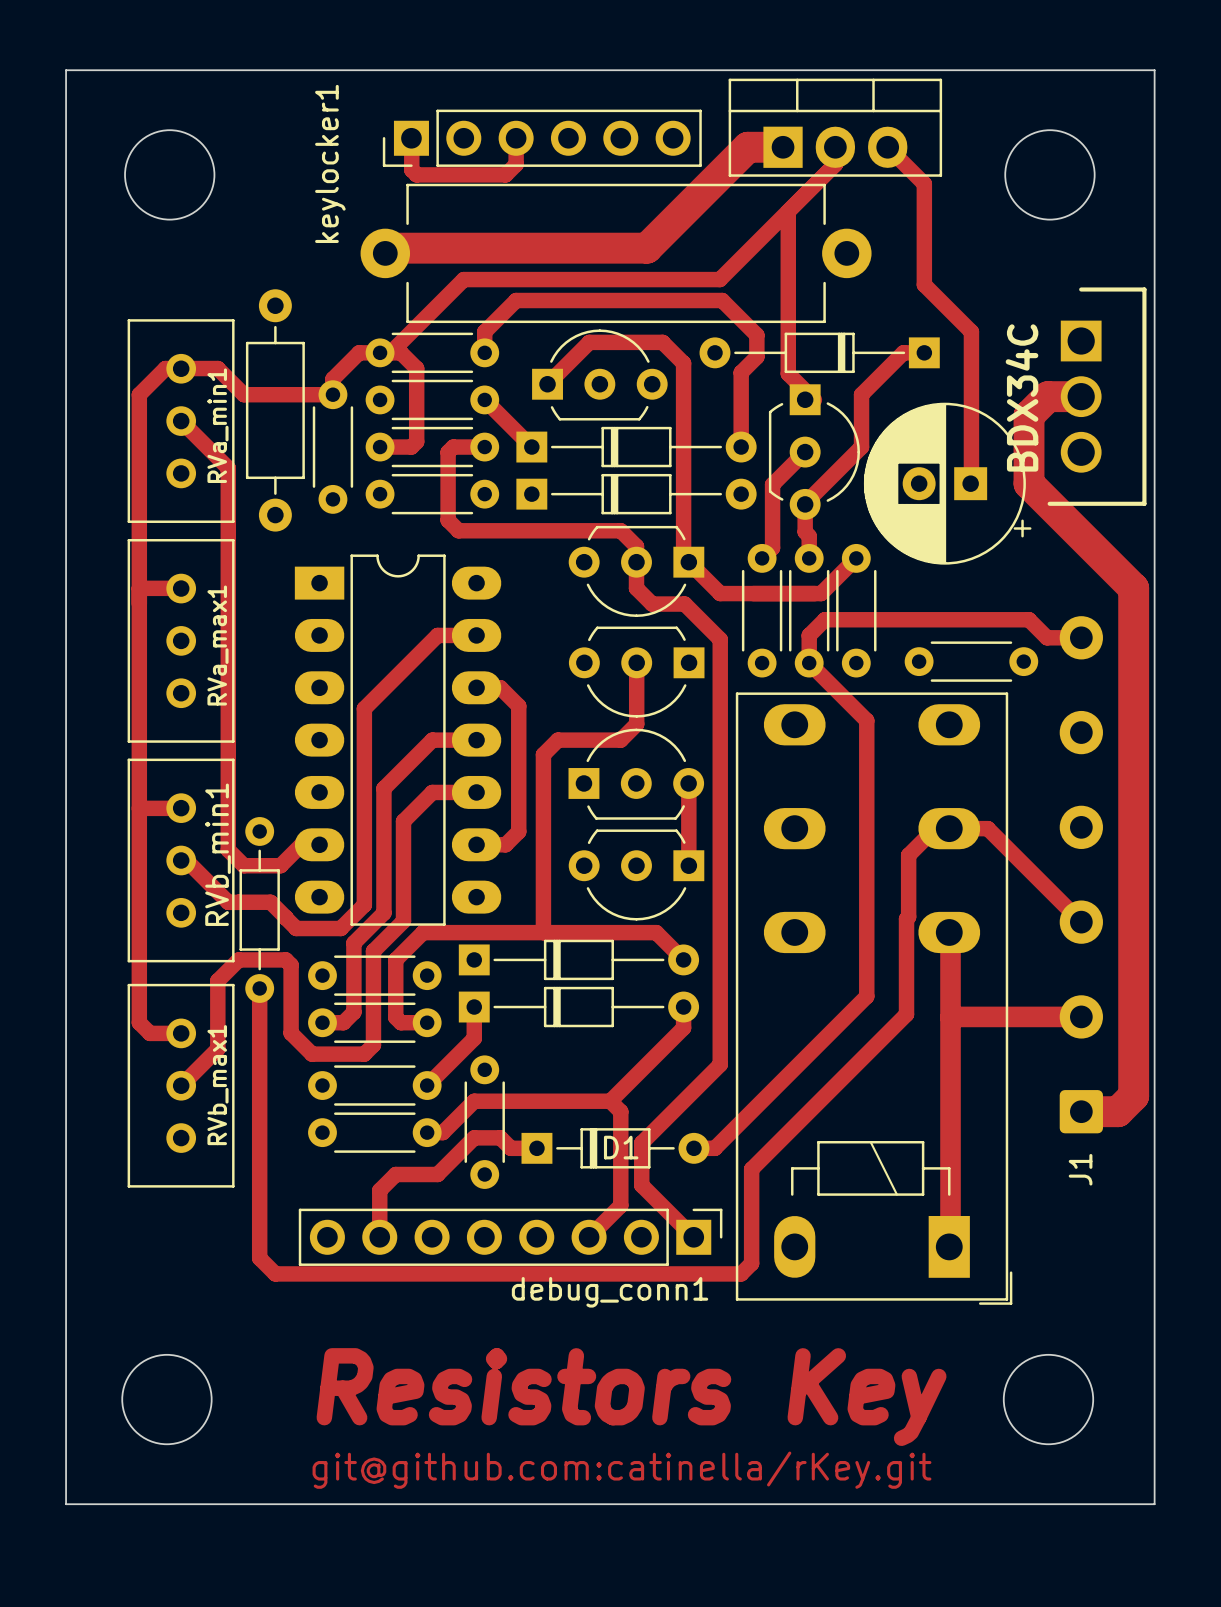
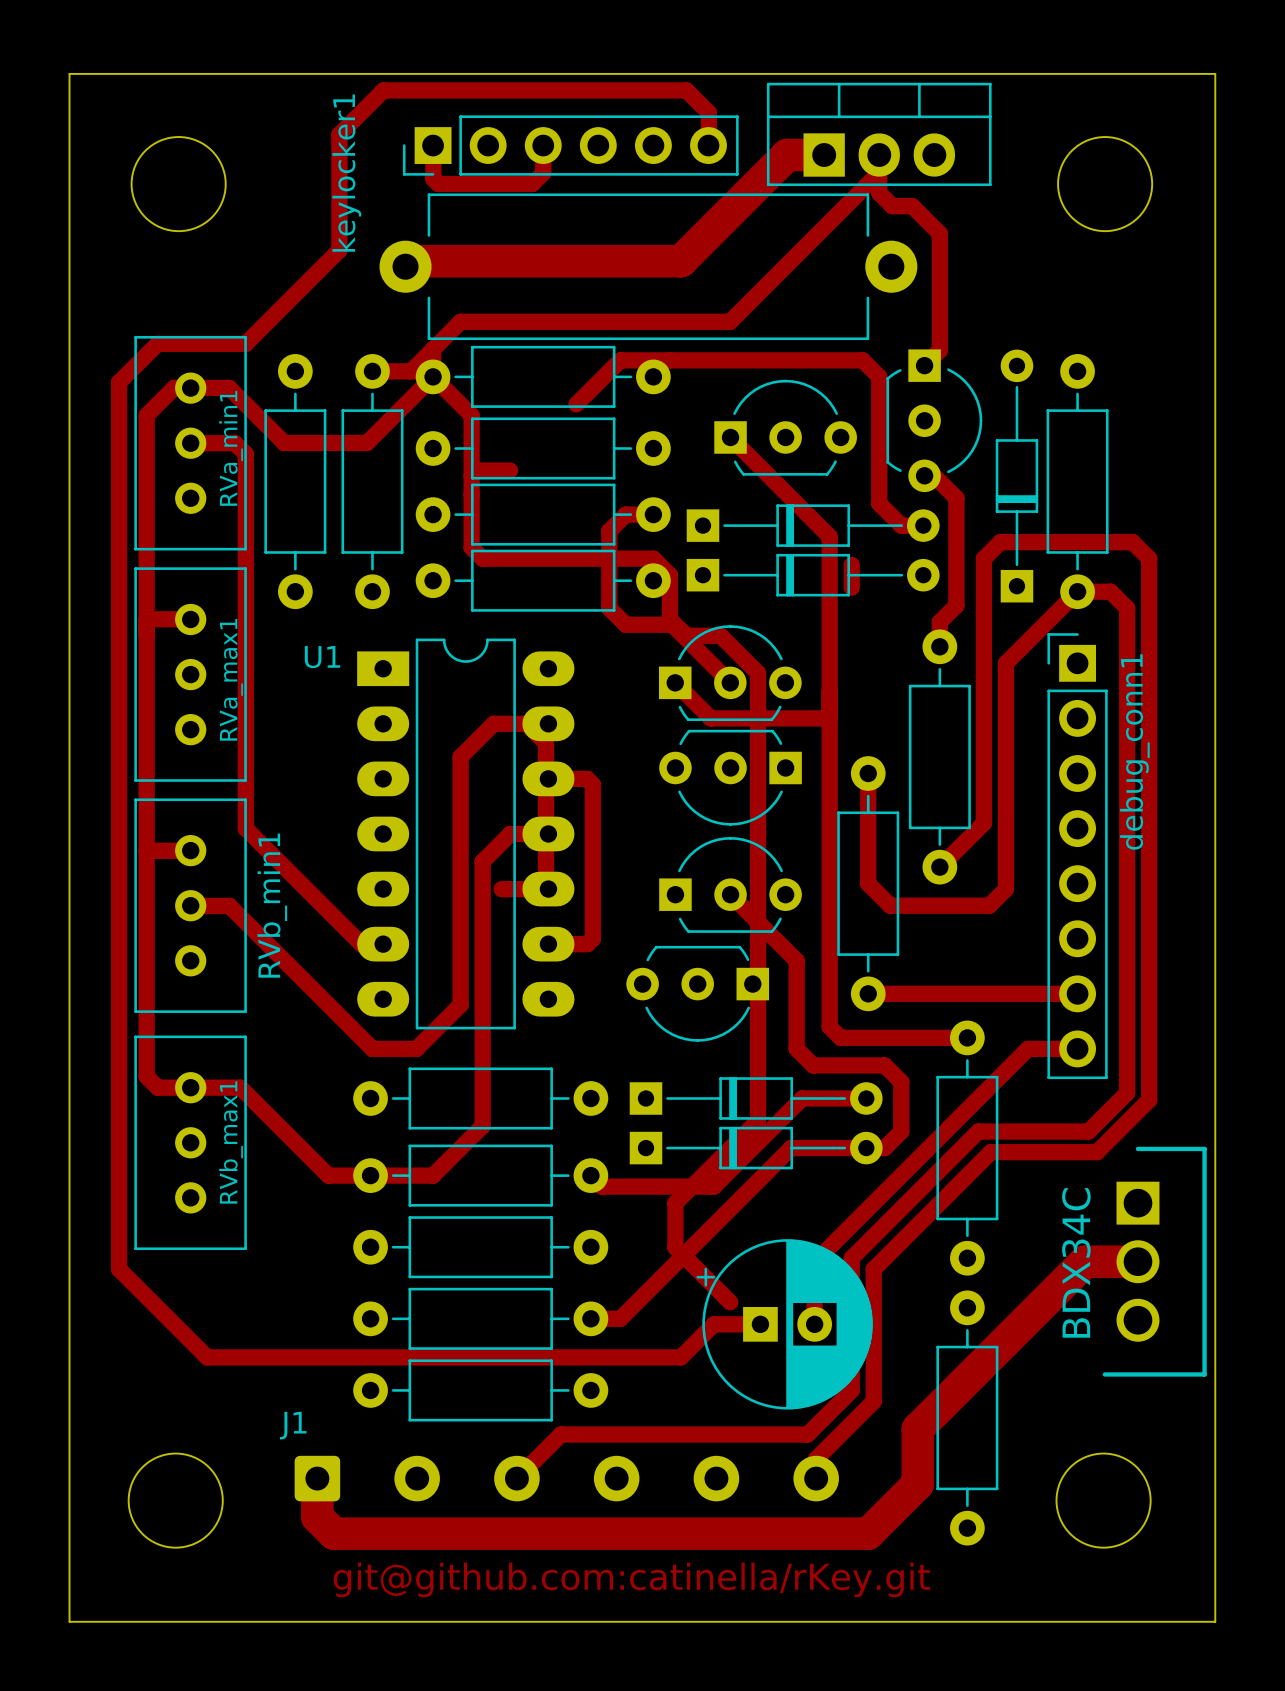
track: none -> (708, 140) (708, 112) (686, 90) (383, 90) (339, 134) (339, 250) (245, 343) (157, 343) (119, 382) (119, 1269) (207, 1357) (680, 1357) (714, 1324) (760, 1324)
track: (887, 147) (924, 183) (924, 284) (971, 331) (970, 483) -> none
track: (835, 164) (788, 211) (788, 373) (814, 399) -> (879, 173) (879, 192) (892, 206) (912, 206) (939, 233) (939, 350) (924, 365)
track: (719, 279) (463, 279) (437, 305) -> (757, 294) (730, 321) (460, 321)
track: (662, 342) (683, 363) (683, 556) (720, 593) (821, 593) (856, 558) -> (697, 360) (862, 360) (879, 376) (879, 503) (901, 525) (923, 525)
track: (359, 352) (332, 379) (332, 394) (243, 394) -> (433, 349) (433, 376) (366, 442) (284, 442) (256, 415)
track: (400, 352) (416, 368) (416, 441) (411, 447) (380, 447) -> (422, 371) (427, 371) (471, 415) (471, 476)
part: (432, 352) -> none
track: (484, 352) (484, 331) (516, 300) (722, 300) (756, 335) (756, 356) (741, 372) (741, 447) -> none
part: (819, 352) -> none
track: (924, 352) (903, 352) (861, 394) (861, 447) (805, 503) (805, 531) (809, 536) -> none
part: none -> (543, 376)
part: (599, 374) -> none
track: (1081, 396) (1048, 396) (1029, 415) (1029, 483) (1133, 588) (1133, 1096) (1117, 1111) (1081, 1111) -> none
part: BDX34C (1097, 396) -> none
part: (432, 399) -> none
track: (484, 399) (531, 447) -> none
part: none -> (934, 420)
part: none -> (785, 427)
part: (275, 410) -> none
track: none -> (730, 437) (829, 536) (829, 1026) (840, 1037) (967, 1037)
track: (181, 421) (228, 468) (228, 850) (243, 865) (280, 865) (301, 844) (319, 844) -> (190, 443) (234, 443) (245, 454) (245, 828) (361, 944) (383, 944)
part: none -> (543, 448)
part: (332, 447) -> none
part: (432, 447) -> none
part: (636, 447) -> none
track: (805, 452) (772, 484) (772, 547) (762, 558) -> none
part: (814, 452) -> none
track: none -> (924, 475) (934, 475) (956, 498) (956, 605) (939, 622) (939, 646)
part: none -> (1016, 476)
part: none -> (295, 481)
part: none -> (372, 481)
part: none -> (1077, 481)
part: (947, 483) -> none
part: none -> (543, 514)
track: none -> (653, 514) (625, 514) (609, 531) (609, 608) (625, 624) (672, 624) (730, 682)
part: (432, 494) -> none
part: (636, 494) -> none
part: none -> (813, 525)
part: none -> (813, 575)
part: none -> (543, 580)
part: (636, 571) -> none
part: (762, 610) -> none
part: (809, 610) -> none
part: (856, 610) -> none
track: (476, 635) (437, 635) (364, 708) (364, 904) (340, 928) (296, 928) (270, 902) (238, 902) -> none
track: (1081, 637) (1047, 637) (1029, 619) (824, 619) (809, 635) (809, 663) (866, 720) (866, 996) (714, 1148) (693, 1148) -> none
part: none -> (730, 673)
track: none -> (675, 682) (710, 718) (829, 718)
part: (971, 661) -> none
track: (636, 662) (636, 724) (620, 740) (558, 740) (543, 754) (543, 932) -> none
part: (636, 672) -> none
part: none -> (939, 756)
track: none -> (868, 773) (868, 883) (890, 905) (989, 905) (1005, 889) (1005, 663) (1077, 591) (1110, 591) (1127, 608) (1127, 1092) (1088, 1131) (978, 1131) (851, 1258) (851, 1390) (807, 1434) (560, 1434) (516, 1478)
part: none -> (730, 777)
part: (398, 740) -> none
track: (476, 740) (432, 740) (383, 788) (383, 913) (353, 943) (353, 1012) (343, 1022) (322, 1022) -> none
track: none -> (548, 778) (587, 778) (592, 784) (592, 938) (587, 944) (548, 944)
part: (636, 774) -> none
track: (688, 783) (688, 865) -> none
U1: none -> (465, 833)
track: (476, 792) (432, 792) (403, 821) (403, 921) (373, 951) (373, 1045) (364, 1054) (312, 1054) (291, 1033) (291, 965) (285, 959) (238, 959) (217, 980) (217, 1049) (181, 1085) -> none
track: none -> (548, 833) (510, 833) (482, 861) (482, 1126) (433, 1175) (328, 1175) (240, 1087) (190, 1087)
track: none -> (939, 867) (983, 823) (983, 558) (1000, 542) (1132, 542) (1149, 558) (1149, 1100) (1097, 1152) (990, 1152) (873, 1269) (873, 1401) (816, 1459) (816, 1478)
part: none -> (868, 883)
part: none -> (730, 884)
track: none -> (730, 894) (796, 960) (796, 1048) (813, 1065) (884, 1065) (901, 1081) (901, 1131) (884, 1148) (791, 1148) (620, 1318) (590, 1318)
RVb_min1 name position: RVb_min1 (218, 854) -> RVb_min1 (272, 905)
track: (181, 860) (186, 860) (228, 902) (238, 902) -> (190, 905) (229, 905) (372, 1048) (416, 1048) (460, 1004) (460, 756) (493, 723) (501, 723)
part: (636, 874) -> none
J1 rotation: 0° (1081, 874) -> 90° clockwise (566, 1478)
J1 position: (1081, 874) -> (566, 1478)
part: (259, 909) -> none
track: (1081, 922) (987, 828) (935, 828) (908, 855) (906, 1014) (751, 1169) (751, 1263) (741, 1273) (275, 1273) (259, 1258) (259, 988) -> none
track: (949, 932) (949, 1246) -> none
part: none -> (697, 993)
track: none -> (868, 993) (1077, 993)
part: (578, 959) -> none
track: (683, 959) (656, 932) (423, 932) (395, 959) (395, 1017) (400, 1022) (427, 1022) -> none
part: (374, 975) -> none
track: none -> (1077, 1048) (1027, 1048) (814, 1262) (814, 1324)
part: (874, 998) -> none
track: (474, 1007) (474, 1038) (427, 1085) -> none
part: (578, 1007) -> none
track: (683, 1007) (683, 1027) (610, 1101) -> none
track: (1081, 1016) (950, 1017) -> none
part: (374, 1022) -> none
part: none -> (480, 1098)
part: none -> (756, 1098)
track: none -> (866, 1098) (802, 1098) (714, 1186) (601, 1186) (590, 1175)
part: (374, 1085) -> none
part: none -> (756, 1148)
part: none -> (967, 1148)
track: (610, 1101) (474, 1101) (442, 1132) (427, 1132) -> none
track: (610, 1101) (620, 1111) (620, 1205) (589, 1237) -> none
part: none -> (480, 1175)
part: (484, 1122) -> none
part: (374, 1132) -> none
track: (536, 1148) (510, 1148) (500, 1137) (474, 1137) (437, 1174) (395, 1174) (379, 1190) (379, 1237) -> none
D1: (615, 1148) -> none
J1 name position: J1 (1080, 1169) -> J1 (293, 1425)
part: none -> (480, 1247)
track: none -> (1137, 1261) (1085, 1261) (917, 1429) (917, 1484) (868, 1533) (333, 1533) (317, 1517) (317, 1478)
part: none -> BDX34C (1154, 1261)
debug_conn1 rotation: 0° (510, 1237) -> 90° counterclockwise (1077, 856)
debug_conn1 position: (510, 1237) -> (1077, 856)
part: none -> (480, 1318)
part: none -> (784, 1324)
part: none -> (480, 1390)
part: none -> (967, 1417)
text: Resistors Key (631, 1397) -> none
round board edge position: (166, 1399) -> (175, 1500)
round board edge position: (1048, 1399) -> (1103, 1500)
text position: git@github.com:catinella/rKey.git (621, 1470) -> git@github.com:catinella/rKey.git (631, 1579)
board edge: (66, 1504) (1154, 1504) -> (69, 1583) (69, 1621) (1215, 1621) (1215, 1583)

